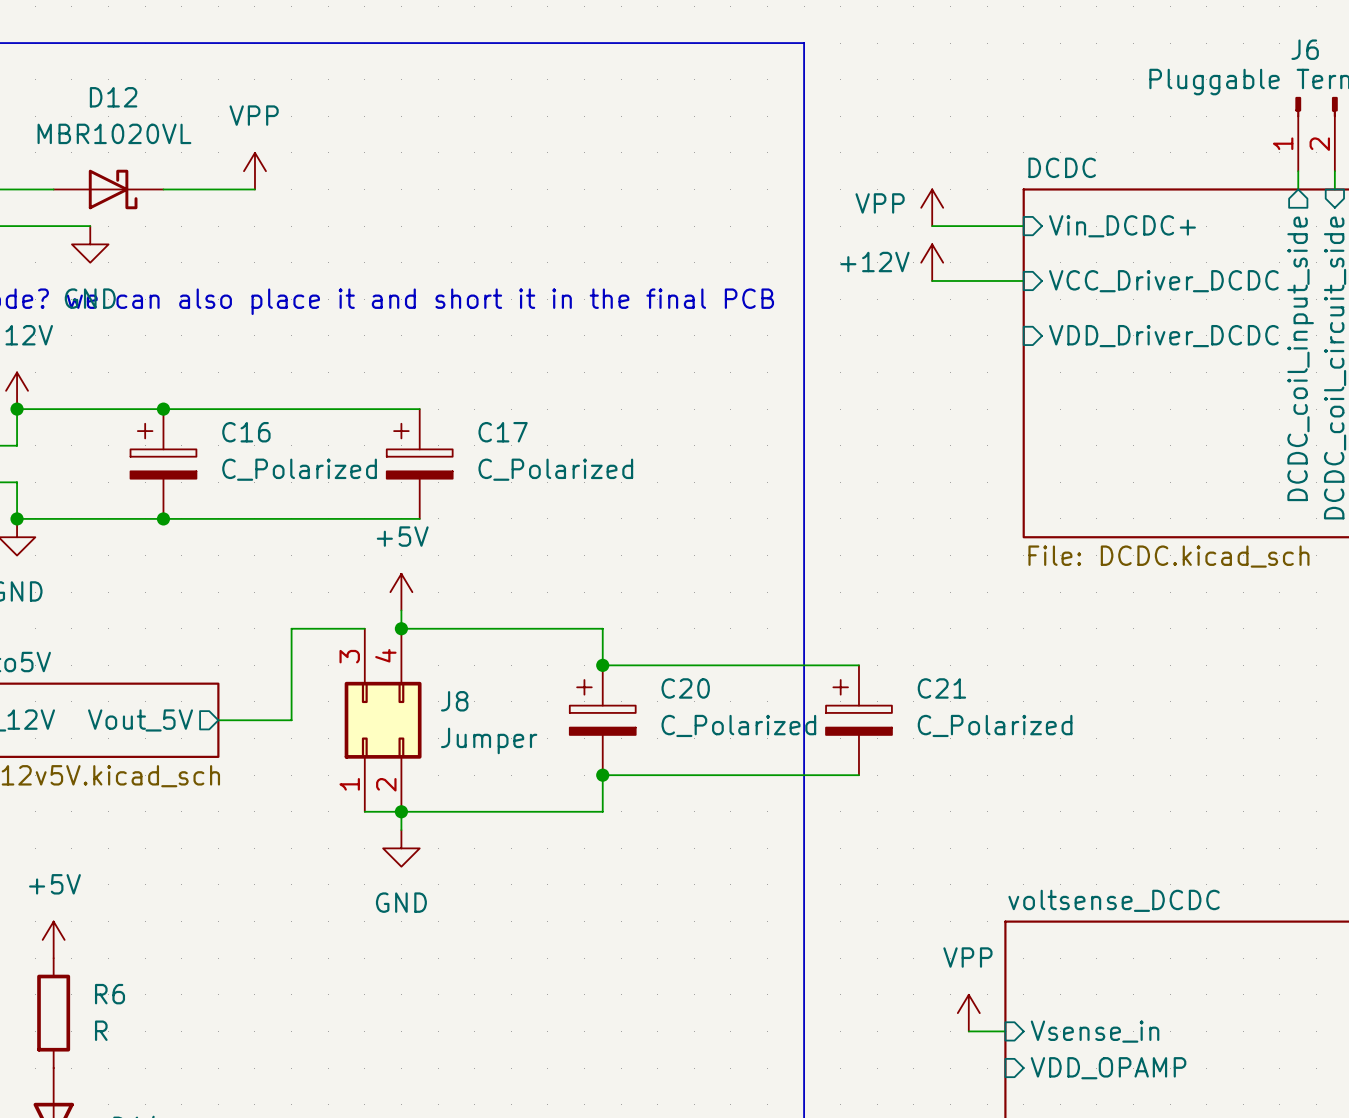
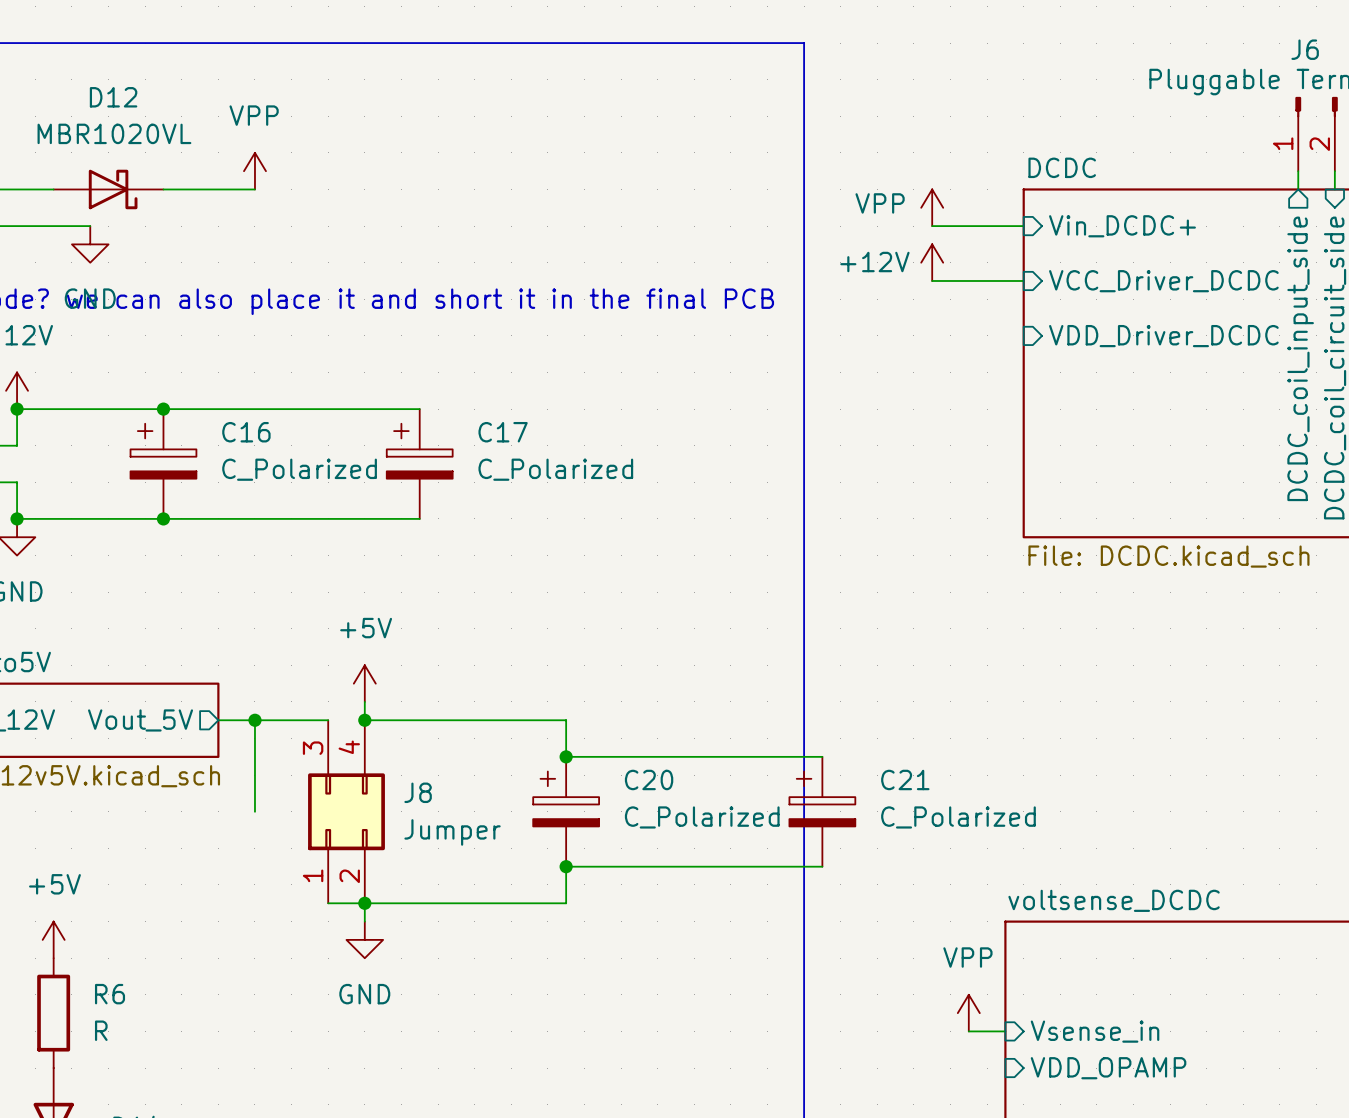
power symbol position: +5V (401, 592) -> +5V (364, 683)
wire: (401, 610) (401, 628) (602, 628) (602, 665) (858, 665) -> (364, 701) (364, 720) (566, 720) (566, 756) (822, 756)
wire: (364, 628) (291, 628) (291, 720) -> (328, 720) (291, 720)
junction: (401, 628) -> none
junction: (602, 665) -> none
wire: none -> (254, 720) (254, 811)
junction: none -> (254, 720)
junction: none -> (364, 720)
J8 position: (383, 720) -> (346, 811)
C20 position: (602, 720) -> (566, 811)
C21 position: (858, 720) -> (822, 811)
junction position: (602, 775) -> (566, 756)
wire: (858, 775) (602, 775) (602, 811) (364, 811) -> (822, 866) (566, 866) (566, 903) (328, 903)
wire: (401, 811) (401, 830) -> (364, 903) (364, 921)
junction: (401, 811) -> none
power symbol position: GND (401, 848) -> GND (364, 939)
junction: none -> (566, 866)
junction: none -> (364, 903)

